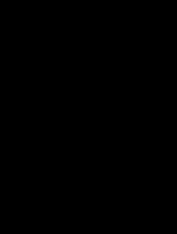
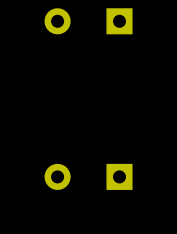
part: none -> (88, 21)
part: none -> (88, 176)

